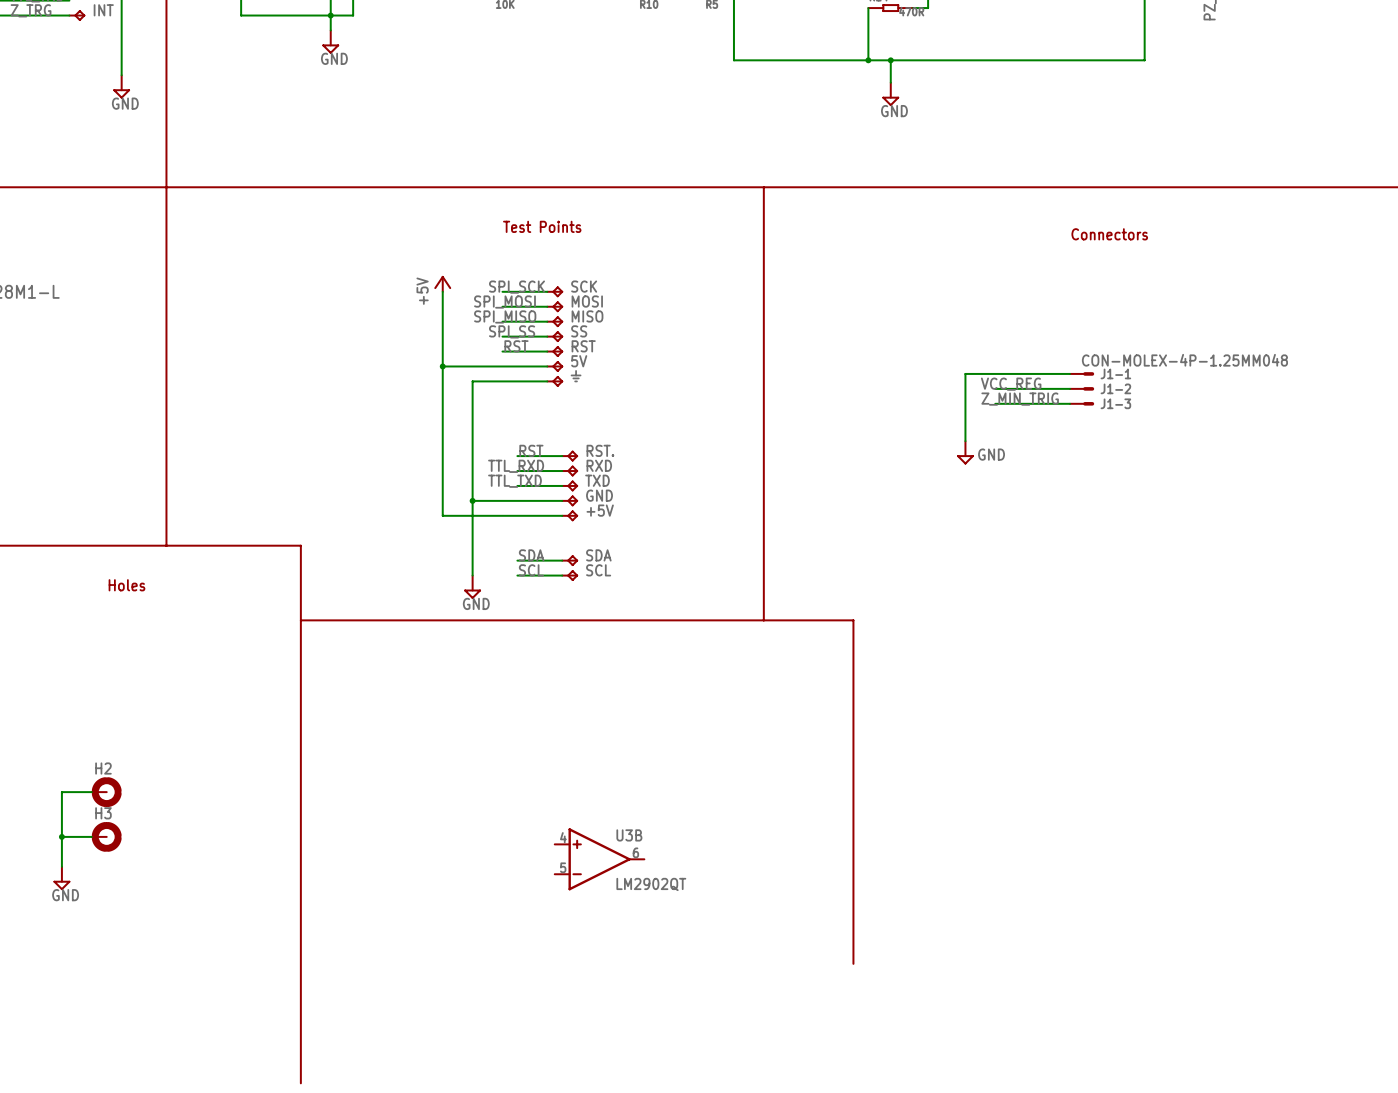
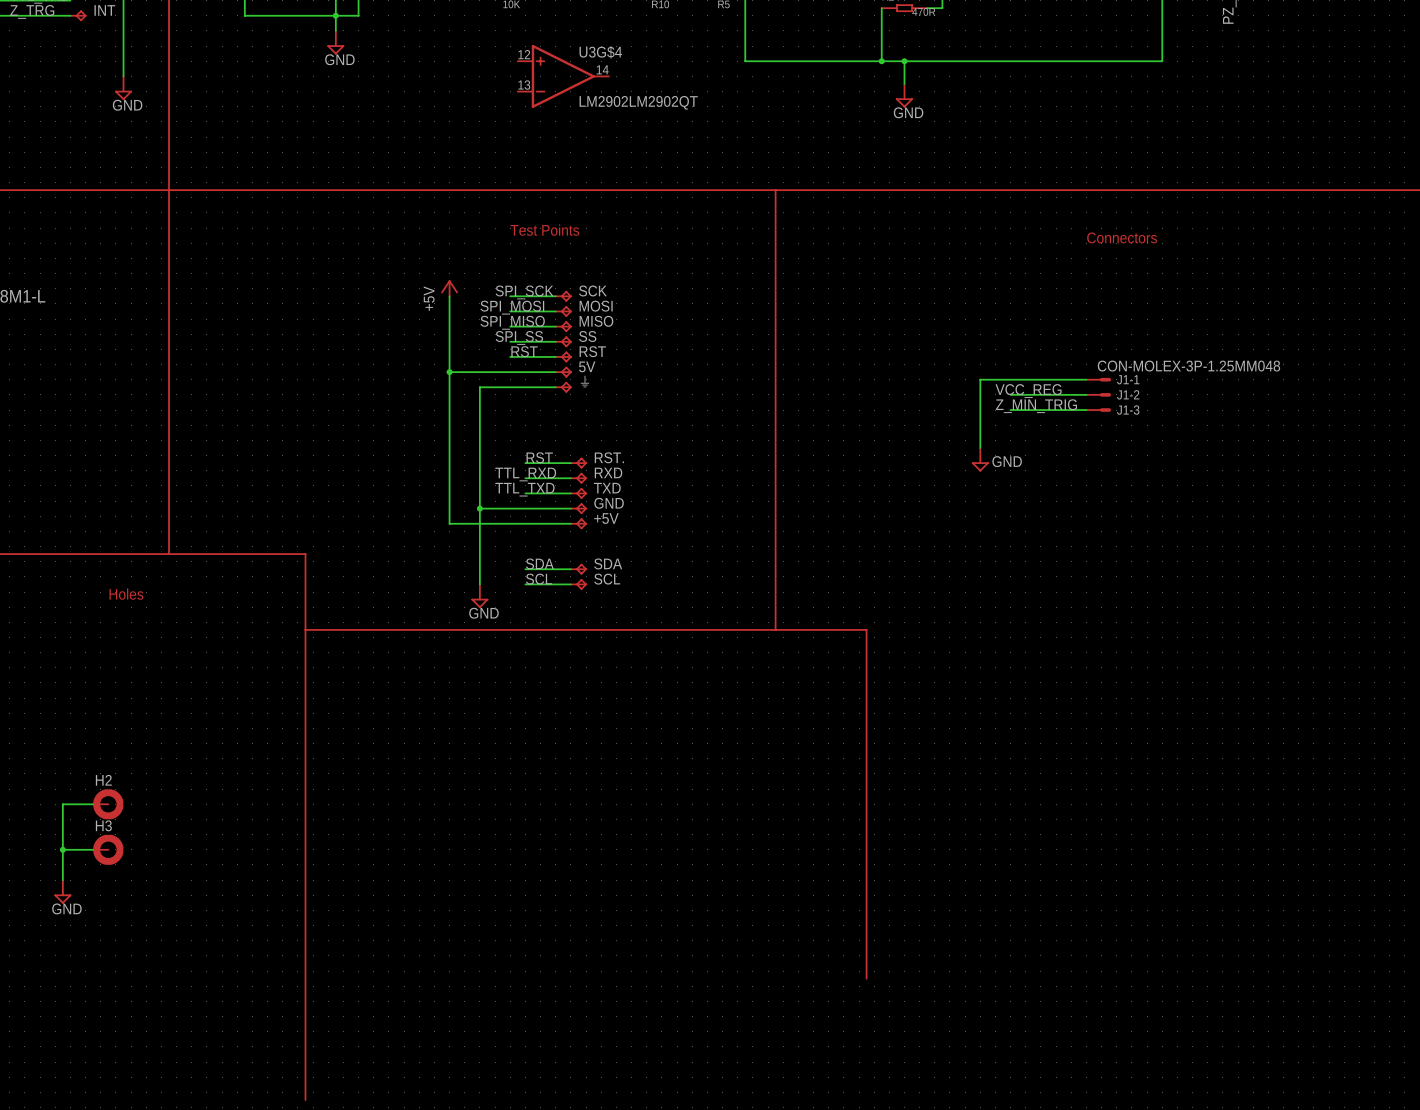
U3G$4: none -> LM2902LM2902QT (563, 76)
J1-1 value: CON-MOLEX-4P-1.25MM048 (1184, 360) -> CON-MOLEX-3P-1.25MM048 (1188, 366)
U3B: LM2902QT (599, 859) -> none

